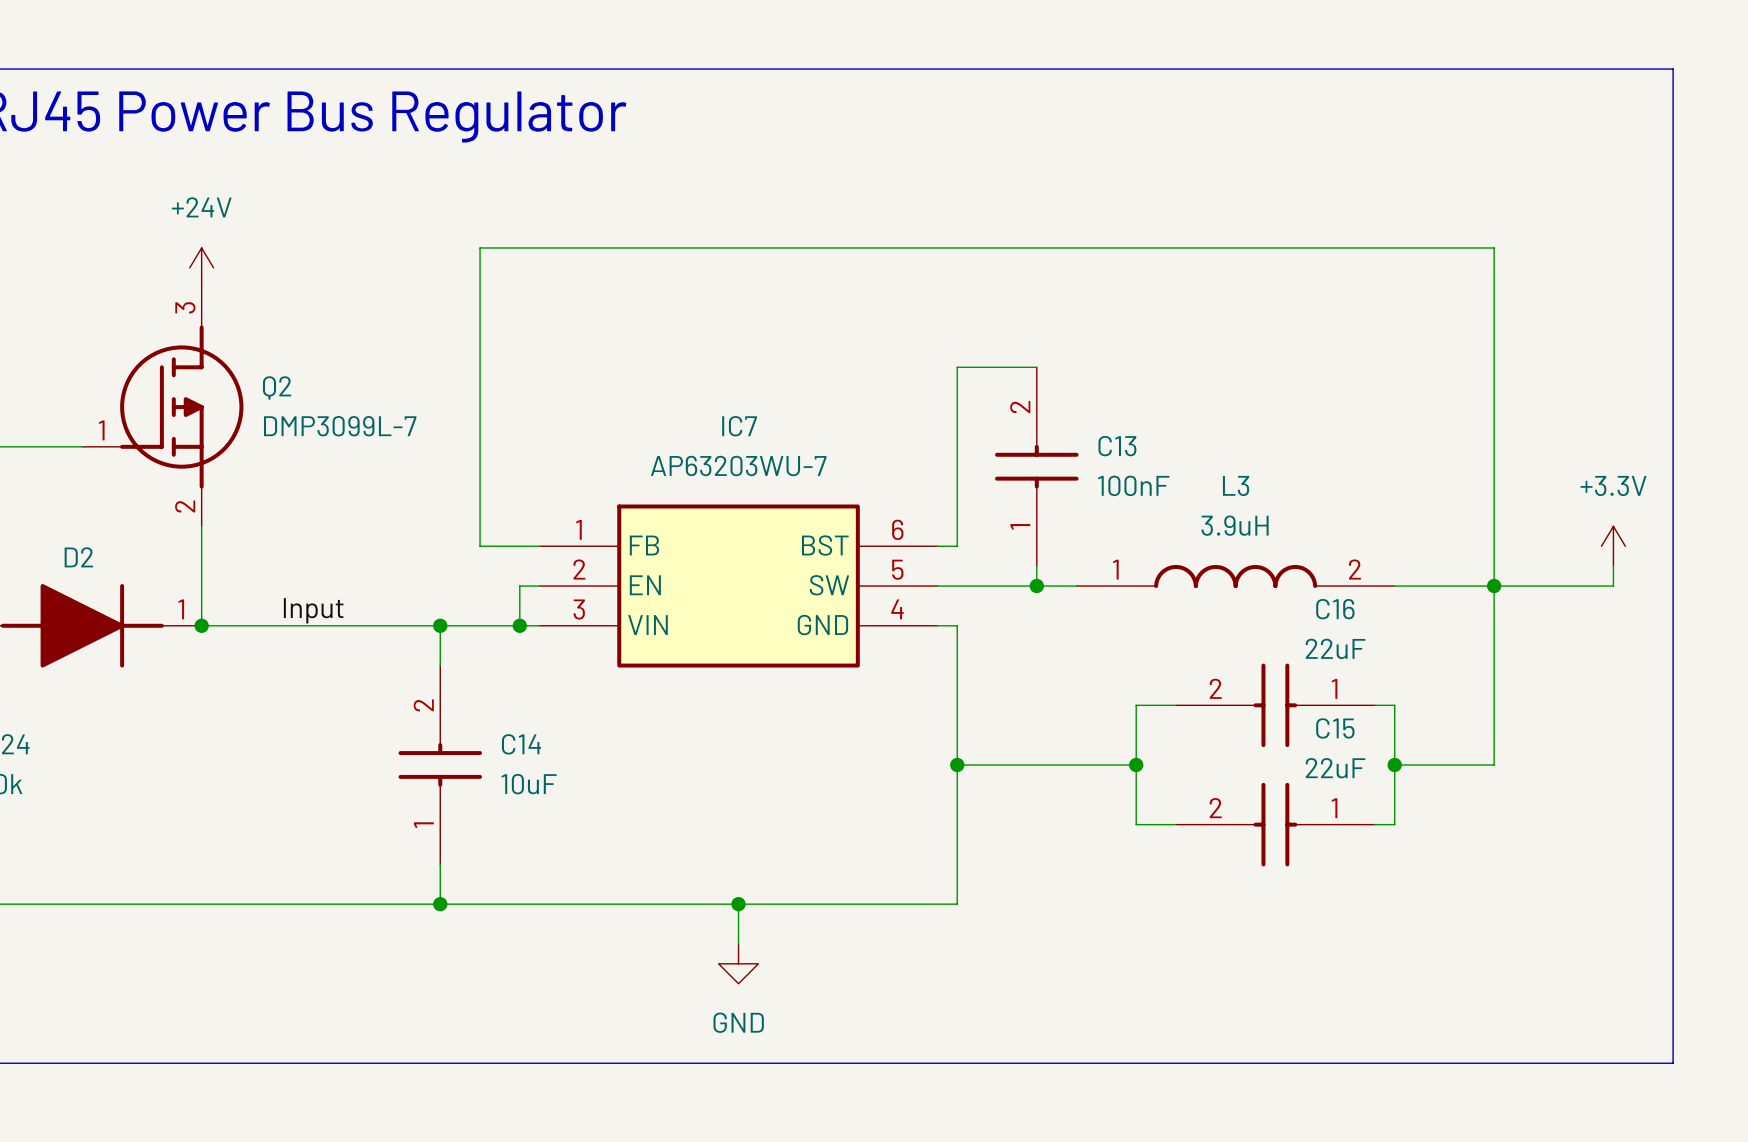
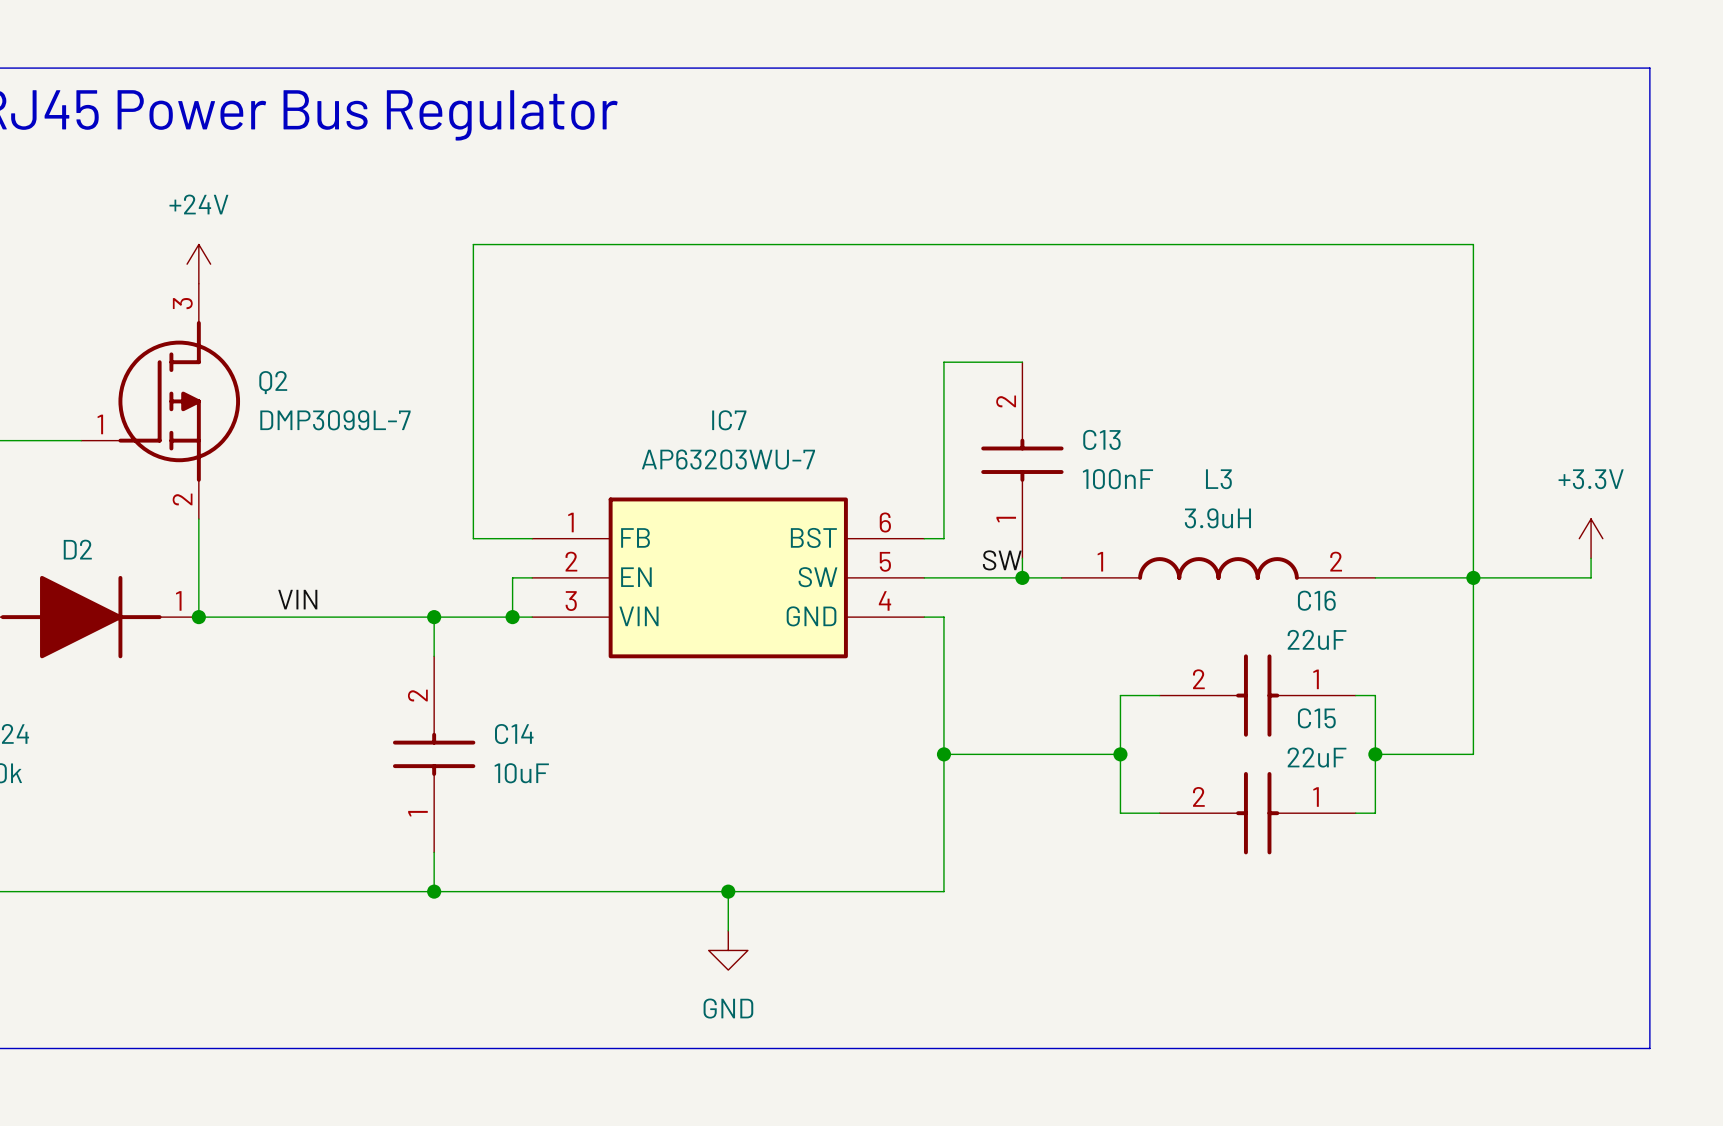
label: none -> SW (1002, 560)
label: Input (313, 610) -> VIN (297, 599)

